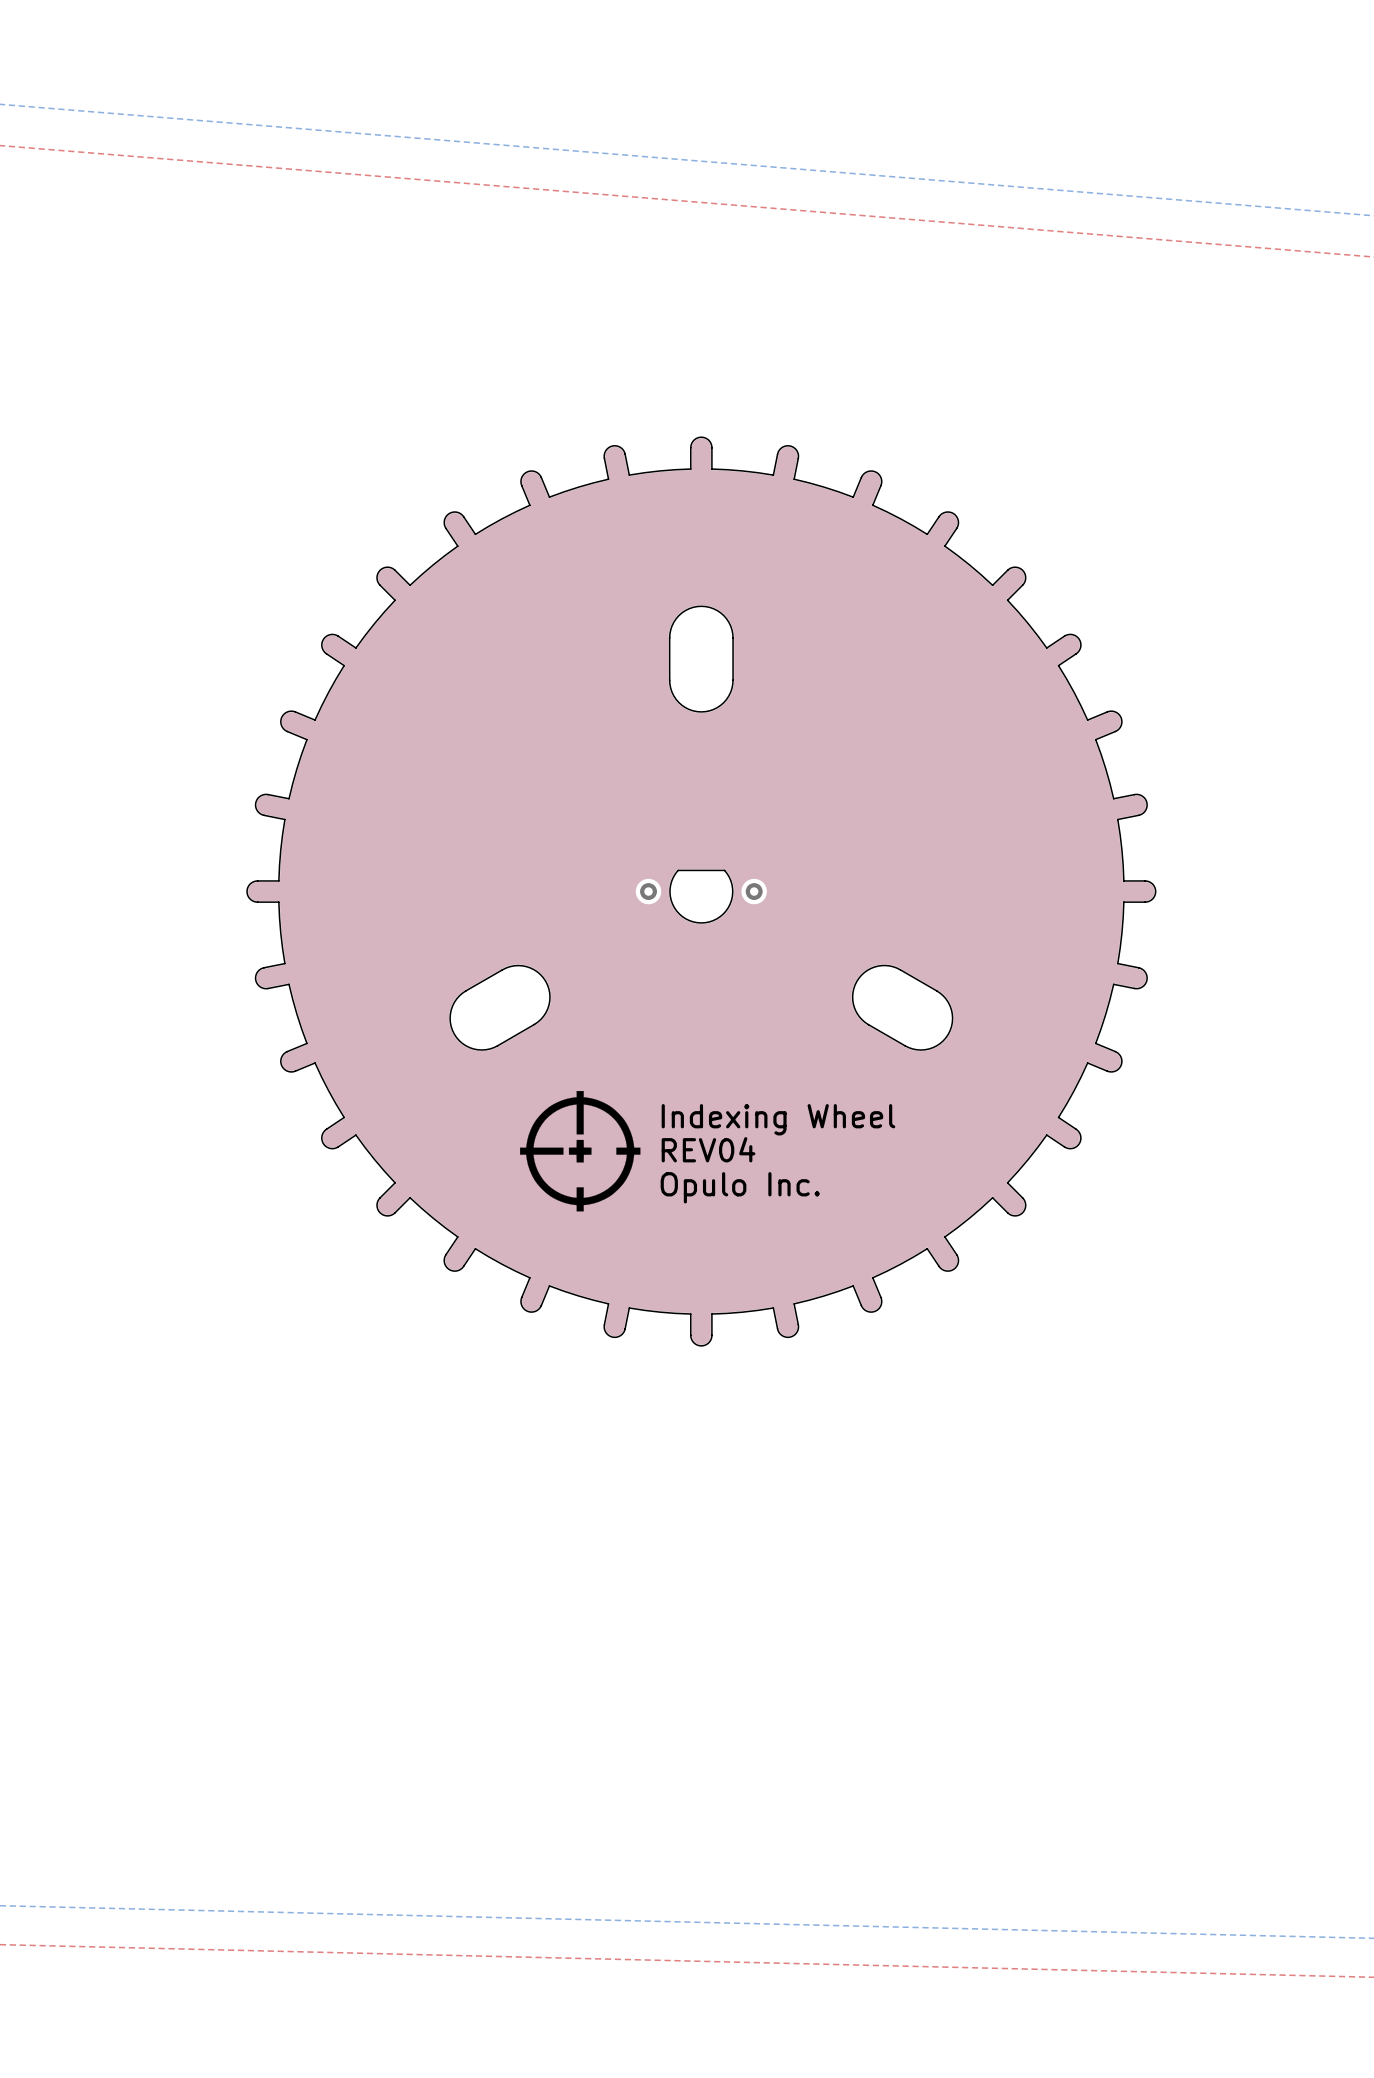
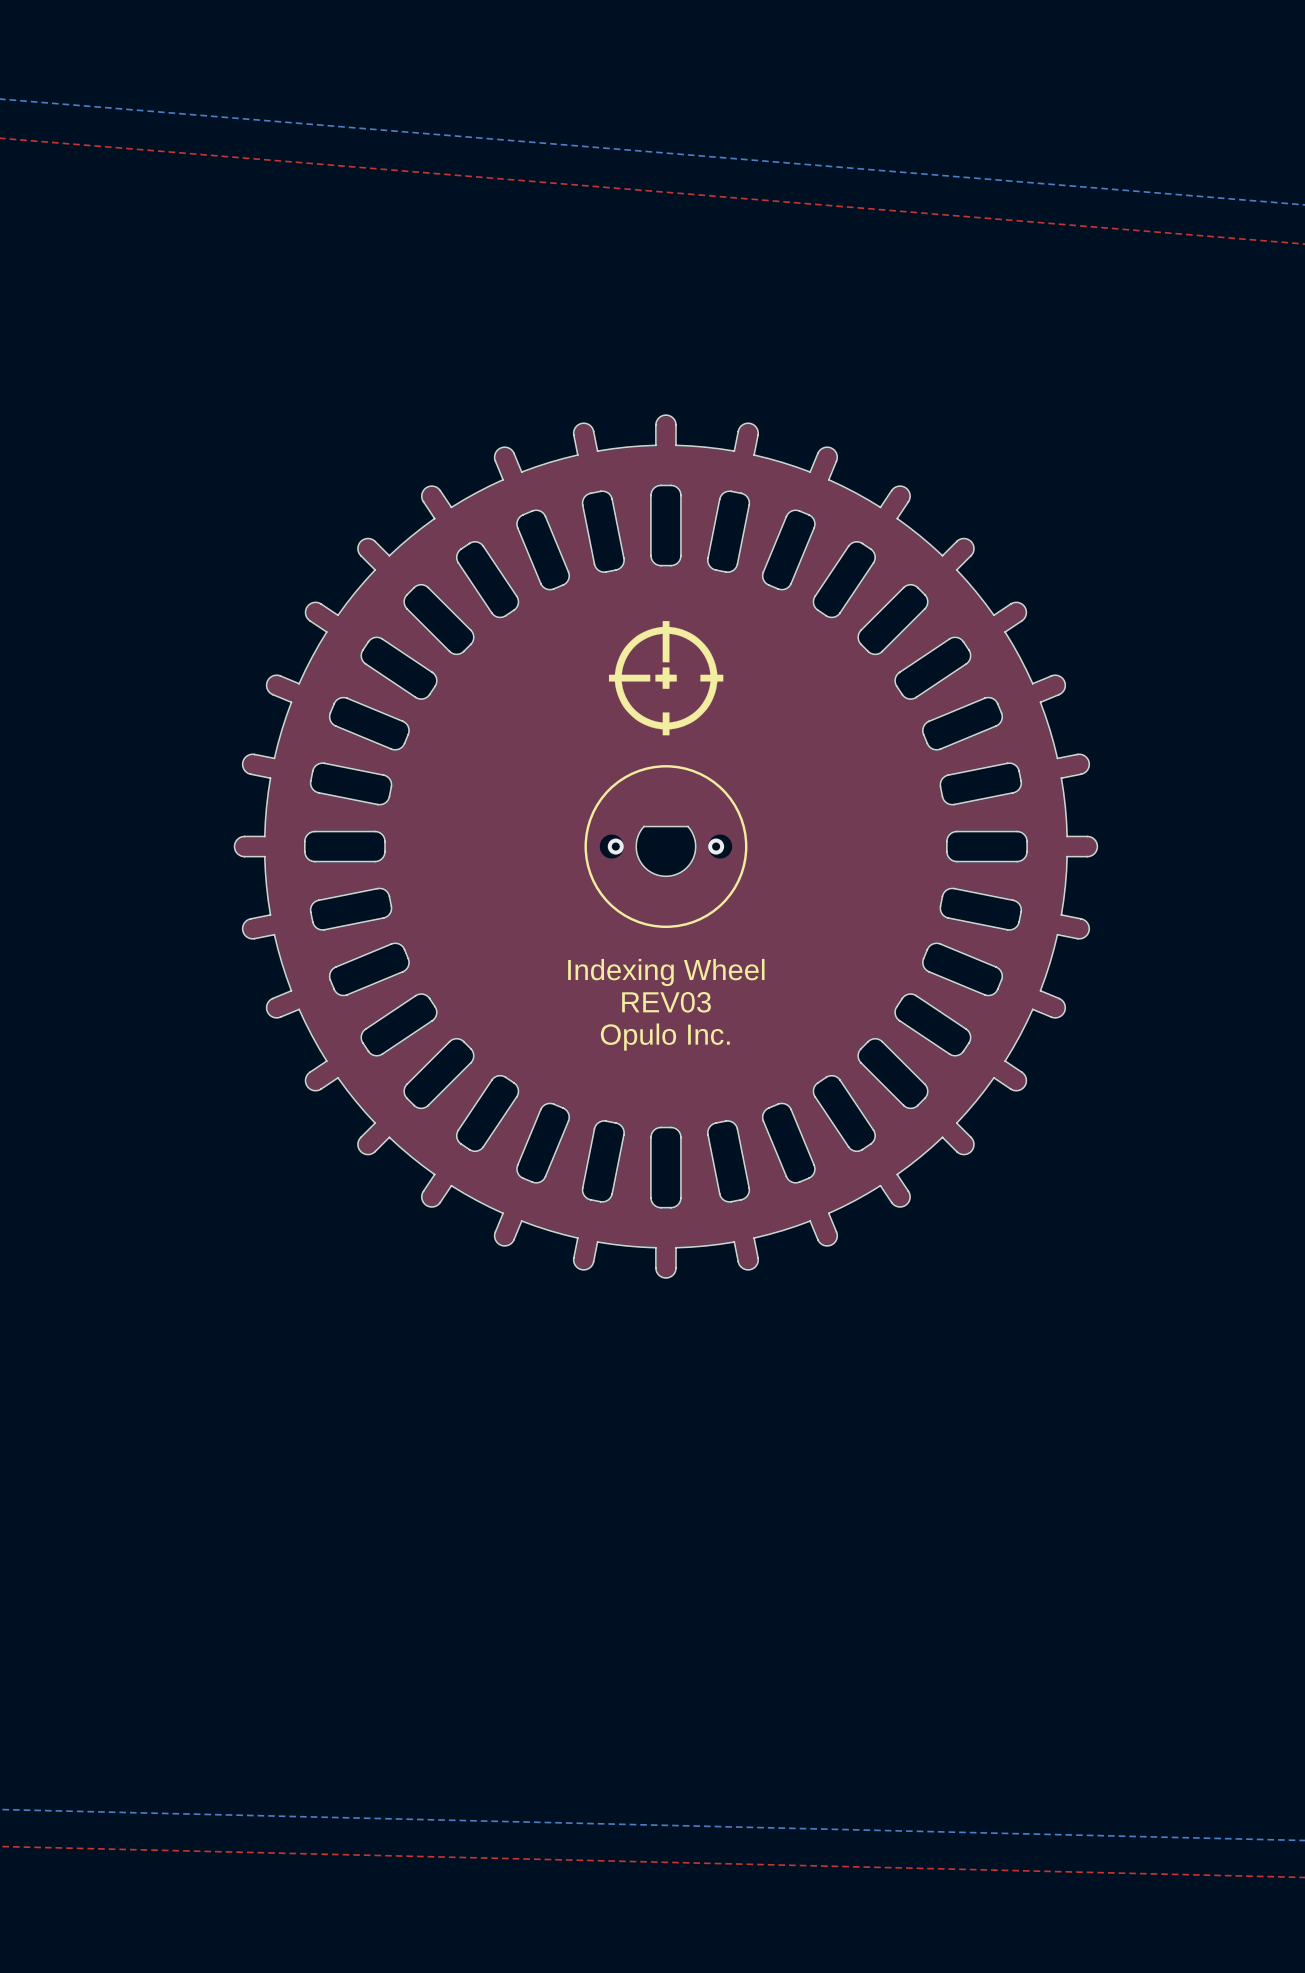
board edge: none -> (660, 485) (674, 486) (680, 494) (680, 556) (678, 562) (672, 565) (657, 564) (650, 556) (650, 494) (653, 488) (660, 485)
board edge: none -> (600, 491) (586, 495) (582, 504) (594, 565) (598, 570) (605, 572) (620, 568) (624, 559) (611, 498) (606, 492) (600, 491)
board edge: none -> (741, 493) (747, 496) (749, 504) (737, 564)
board edge: none -> (741, 493) (728, 491) (720, 497) (707, 559) (711, 568) (725, 572) (733, 570) (737, 564)
board edge: none -> (532, 510) (519, 517) (517, 526) (541, 584) (546, 588) (552, 589) (566, 582) (568, 573) (545, 515) (540, 510) (532, 510)
board edge: none -> (799, 510) (812, 517) (814, 526) (790, 584) (785, 588) (779, 589) (765, 582) (763, 573) (786, 515) (792, 510) (799, 510)
board edge: none -> (469, 543) (477, 541) (482, 545) (517, 597) (517, 606) (504, 616) (498, 617) (492, 613) (457, 561) (458, 551) (469, 543)
board edge: none -> (862, 543) (873, 551) (874, 561) (839, 613) (833, 617) (827, 616) (815, 607) (814, 597) (849, 545) (856, 541) (862, 543)
board edge: none -> (414, 587) (404, 597) (406, 607) (450, 652) (456, 654) (462, 652) (472, 641) (473, 636) (471, 631) (427, 586) (421, 584) (414, 587)
board edge: none -> (903, 587) (859, 632) (859, 642) (870, 653) (876, 654) (881, 652) (926, 606) (926, 597) (916, 586) (910, 584) (903, 587)
board edge: (669, 637) (669, 684) (676, 699) (685, 707) (697, 711) (709, 710) (720, 705) (728, 696) (732, 684) (732, 633) (726, 618) (720, 612) (709, 607) (697, 606) (689, 608) (676, 618) (670, 629) (669, 637) -> none
board edge: none -> (382, 638) (434, 674) (436, 683) (427, 696) (421, 699) (416, 698) (363, 661) (361, 653) (369, 640) (374, 637) (382, 638)
board edge: none -> (949, 638) (897, 674) (895, 684) (904, 697) (909, 699) (915, 698) (968, 661) (970, 653) (962, 640) (957, 637) (949, 638)
board edge: none -> (347, 698) (405, 723) (408, 732) (402, 746) (398, 749) (392, 749) (332, 724) (329, 716) (334, 702) (339, 698) (347, 698)
board edge: none -> (984, 698) (926, 723) (922, 732) (929, 746) (933, 749) (939, 749) (998, 724) (1002, 716) (997, 702) (992, 698) (984, 698)
board edge: none -> (1007, 763) (945, 776) (940, 784) (943, 799) (947, 803) (953, 804) (1016, 791) (1021, 784) (1018, 770) (1013, 764) (1007, 763)
drawing: none -> [584, 765, 748, 929]
board edge: none -> (312, 771) (316, 765) (323, 763) (384, 775) (391, 782) (389, 797) (385, 803) (378, 804) (317, 792) (310, 785) (312, 771)
board edge: none -> (314, 831) (378, 832) (384, 838) (384, 854) (381, 859) (376, 861) (312, 861) (305, 855) (304, 840) (307, 834) (314, 831)
board edge: none -> (956, 831) (1019, 831) (1026, 838) (1026, 854) (1023, 859) (1018, 861) (953, 861) (947, 854) (946, 840) (949, 834) (956, 831)
board edge: none -> (377, 888) (315, 901) (310, 909) (313, 925) (317, 928) (323, 929) (386, 916) (391, 909) (389, 895) (385, 890) (377, 888)
board edge: none -> (948, 918) (1010, 929) (1018, 924) (1021, 908) (1018, 903) (1014, 900) (950, 888) (943, 893) (940, 907) (941, 913) (948, 918)
board edge: (502, 969) (462, 993) (452, 1006) (450, 1018) (452, 1030) (459, 1040) (469, 1047) (485, 1049) (497, 1045) (537, 1022) (547, 1009) (549, 996) (548, 988) (543, 977) (537, 971) (526, 966) (518, 965) (502, 969) -> none
board edge: (900, 969) (940, 993) (950, 1006) (952, 1018) (950, 1030) (943, 1040) (933, 1047) (920, 1050) (908, 1047) (865, 1022) (855, 1010) (853, 992) (861, 975) (878, 966) (889, 965) (900, 969) -> none
board edge: none -> (391, 943) (335, 967) (332, 968) (329, 977) (335, 992) (340, 995) (346, 995) (405, 970) (409, 961) (404, 948) (398, 943) (394, 943) (392, 943) (391, 943)
board edge: none -> (940, 943) (998, 968) (1002, 977) (995, 992) (991, 995) (985, 995) (926, 970) (922, 961) (927, 948) (933, 943) (940, 943)
board edge: none -> (916, 995) (968, 1031) (970, 1039) (961, 1053) (957, 1055) (950, 1054) (897, 1018) (895, 1009) (903, 997) (908, 994) (916, 995)
text: none -> REV03 (666, 1002)
board edge: none -> (362, 1043) (361, 1036) (364, 1029) (416, 995) (426, 995) (435, 1007) (436, 1014) (433, 1020) (381, 1054) (371, 1054) (362, 1043)
text position: Indexing Wheel (778, 1119) -> Indexing Wheel (666, 972)
board edge: none -> (505, 1077) (516, 1085) (517, 1095) (482, 1147) (477, 1151) (470, 1150) (458, 1141) (457, 1131) (492, 1079) (499, 1075) (505, 1077)
board edge: none -> (826, 1077) (814, 1086) (814, 1095) (849, 1147) (854, 1151) (861, 1150) (873, 1141) (874, 1131) (839, 1079) (833, 1075) (826, 1077)
board edge: none -> (924, 1084) (927, 1091) (925, 1097) (915, 1107) (906, 1107) (860, 1062) (858, 1056) (859, 1051) (870, 1040) (880, 1040) (924, 1084)
text: REV04 (708, 1149) -> none
drawing position: (580, 1151) -> (666, 678)
board edge: none -> (553, 1104) (566, 1110) (568, 1120) (545, 1177) (540, 1182) (533, 1182) (519, 1175) (517, 1166) (541, 1108) (547, 1103) (553, 1104)
board edge: none -> (778, 1104) (765, 1110) (763, 1120) (786, 1177) (791, 1182) (798, 1182) (812, 1175) (814, 1166) (790, 1108) (784, 1103) (778, 1104)
board edge: none -> (428, 1105) (421, 1108) (415, 1106) (405, 1095) (405, 1086) (450, 1040) (455, 1038) (461, 1039) (472, 1050) (472, 1060) (428, 1105)
board edge: none -> (606, 1121) (620, 1124) (624, 1133) (611, 1194) (607, 1200) (601, 1201) (586, 1197) (582, 1189) (594, 1127) (598, 1122) (606, 1121)
board edge: none -> (725, 1121) (711, 1124) (707, 1133) (719, 1194) (723, 1200) (730, 1201) (745, 1197) (749, 1189) (737, 1127) (733, 1122) (725, 1121)
board edge: none -> (660, 1127) (674, 1128) (680, 1136) (680, 1198) (678, 1204) (672, 1207) (657, 1206) (650, 1198) (650, 1136) (654, 1129) (660, 1127)
text position: Opulo Inc. (740, 1187) -> Opulo Inc. (665, 1037)

